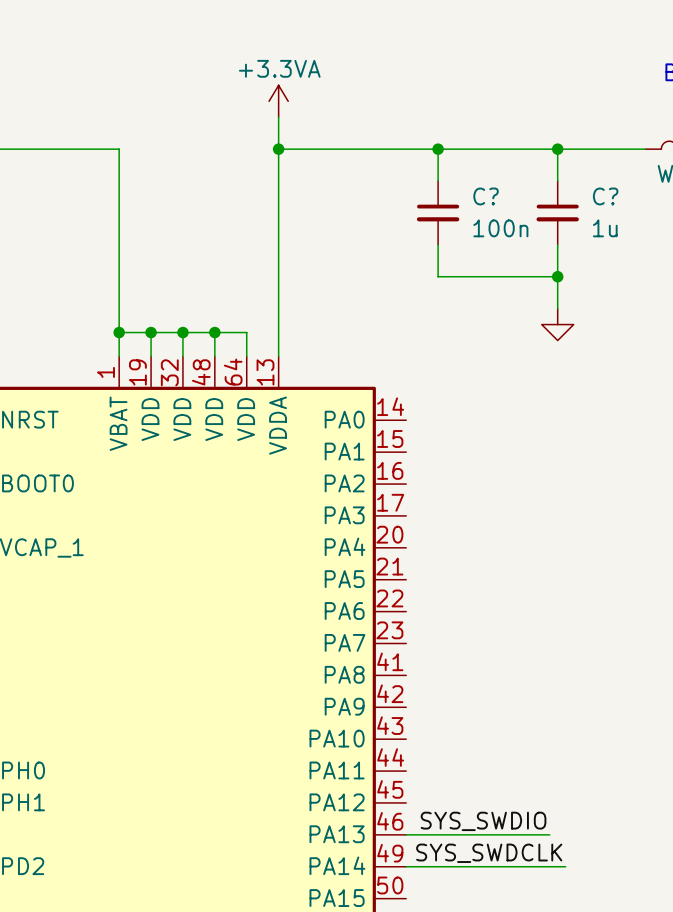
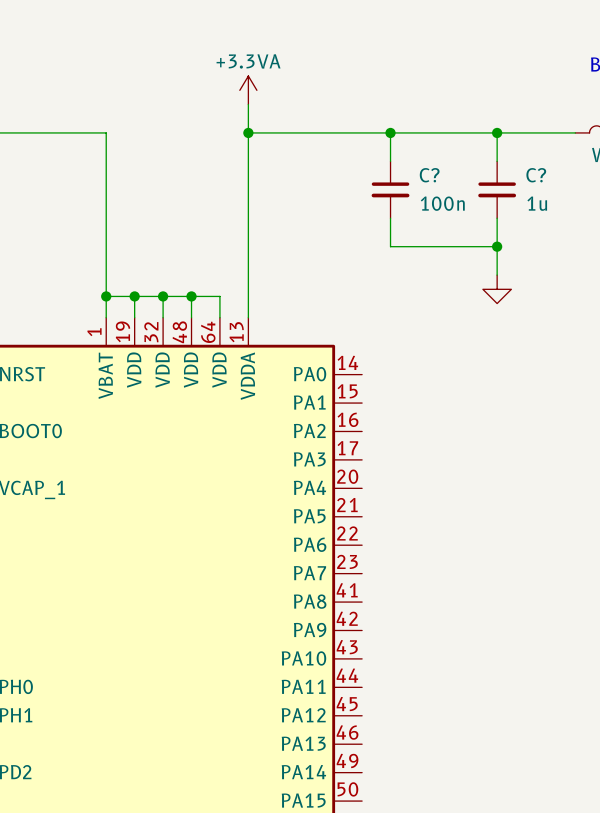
label: SYS_SWDIO (483, 821) -> none
wire: (406, 834) (549, 834) -> none
label: SYS_SWDCLK (489, 853) -> none
wire: (406, 866) (565, 866) -> none

